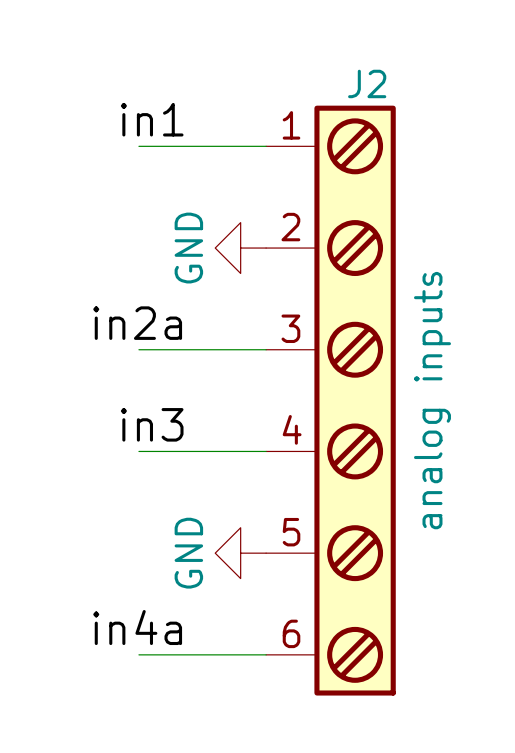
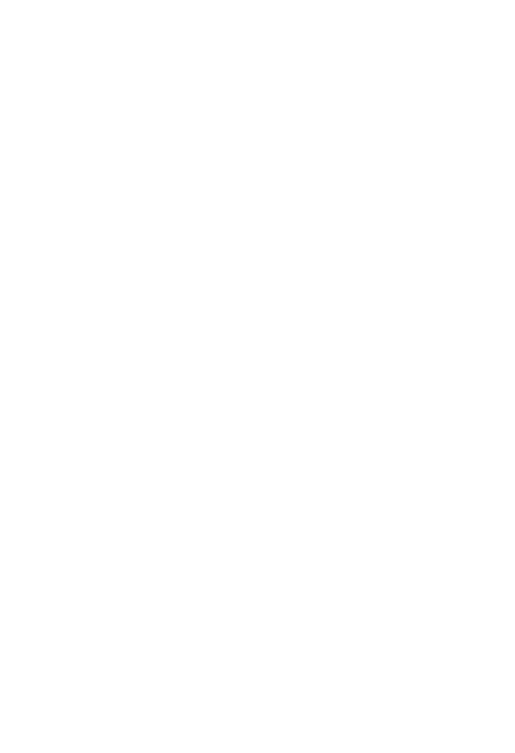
label: in1 (152, 119) -> none
wire: (138, 146) (266, 146) -> none
power symbol: GND (240, 248) -> none
label: in2a (137, 323) -> none
wire: (138, 349) (266, 349) -> none
J2: analog inputs (330, 400) -> none
label: in3 (152, 424) -> none
wire: (138, 451) (266, 451) -> none
power symbol: GND (240, 553) -> none
label: in4a (137, 627) -> none
wire: (138, 654) (266, 654) -> none

